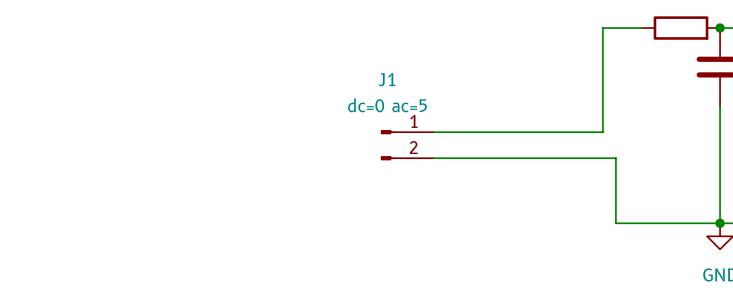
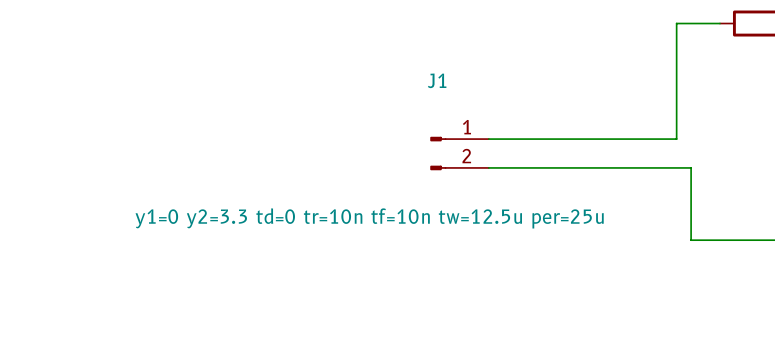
J1 value: dc=0 ac=5 (387, 105) -> y1=0 y2=3.3 td=0 tr=10n tf=10n tw=12.5u per=25u (369, 218)

